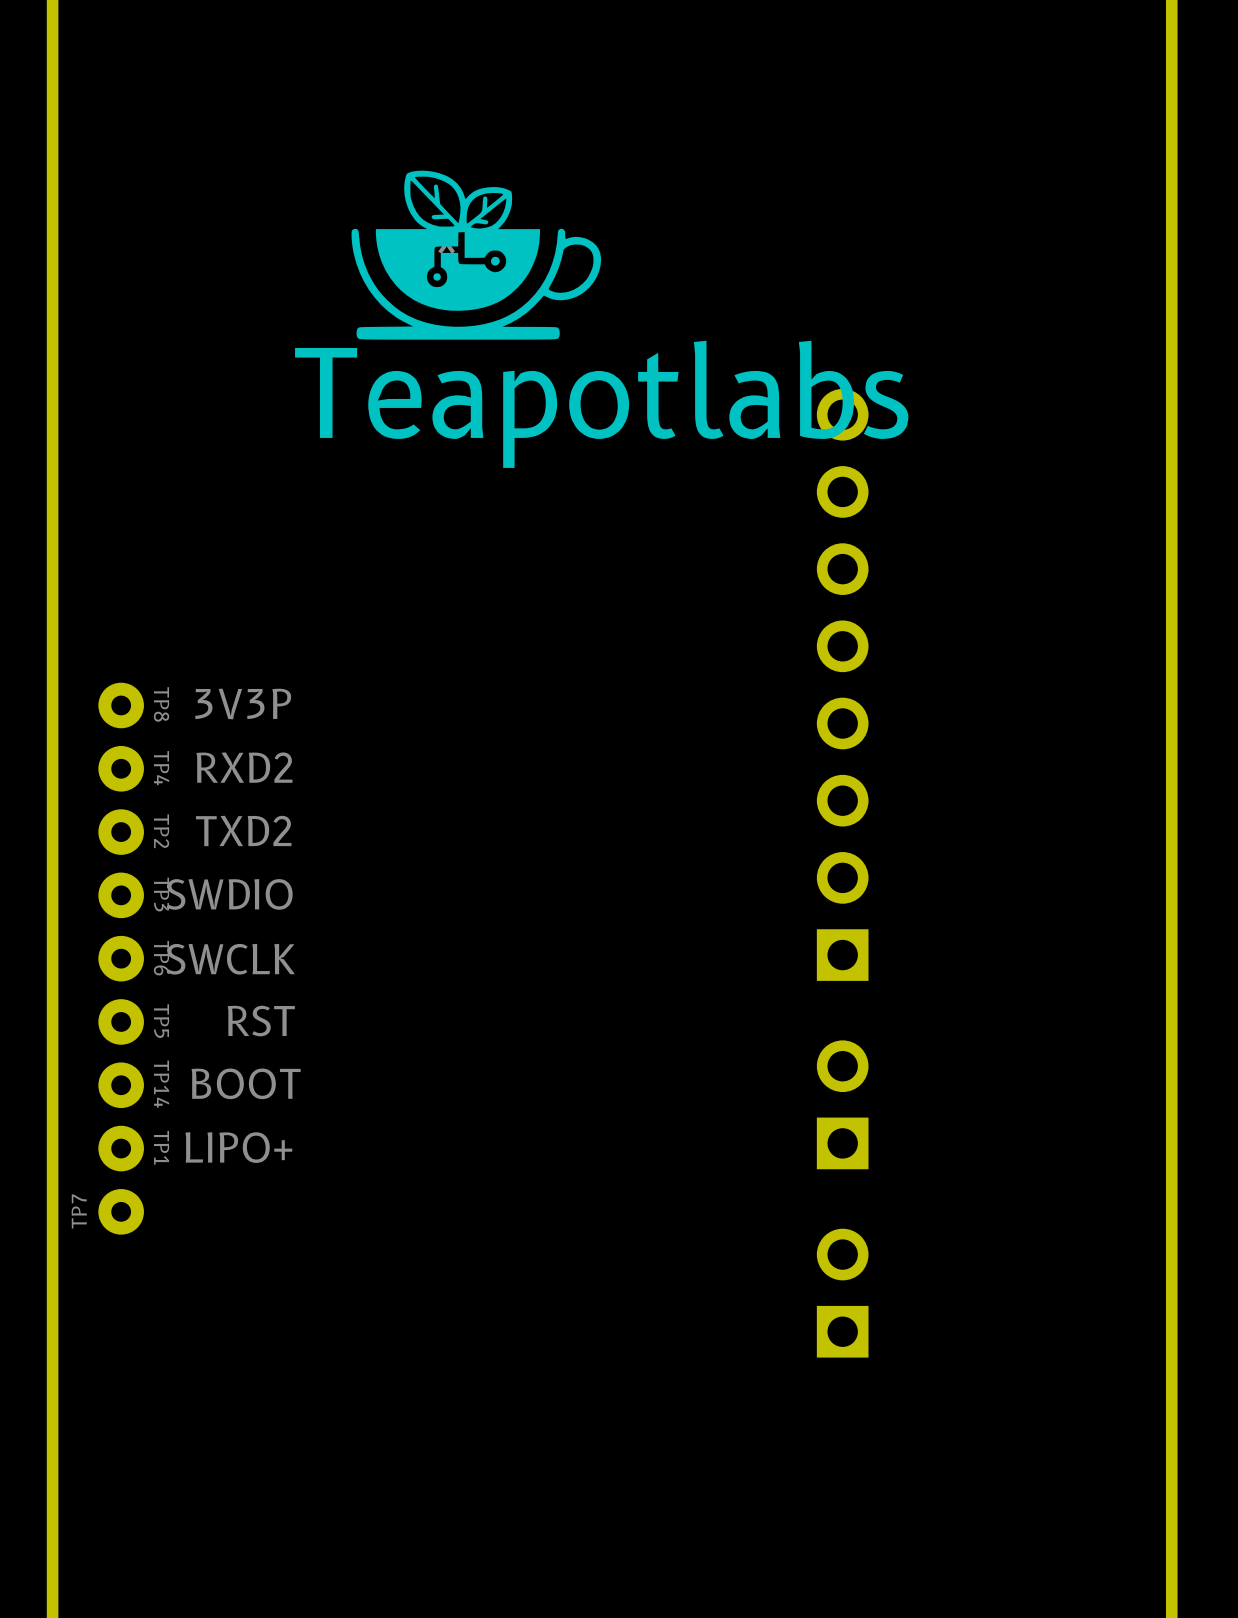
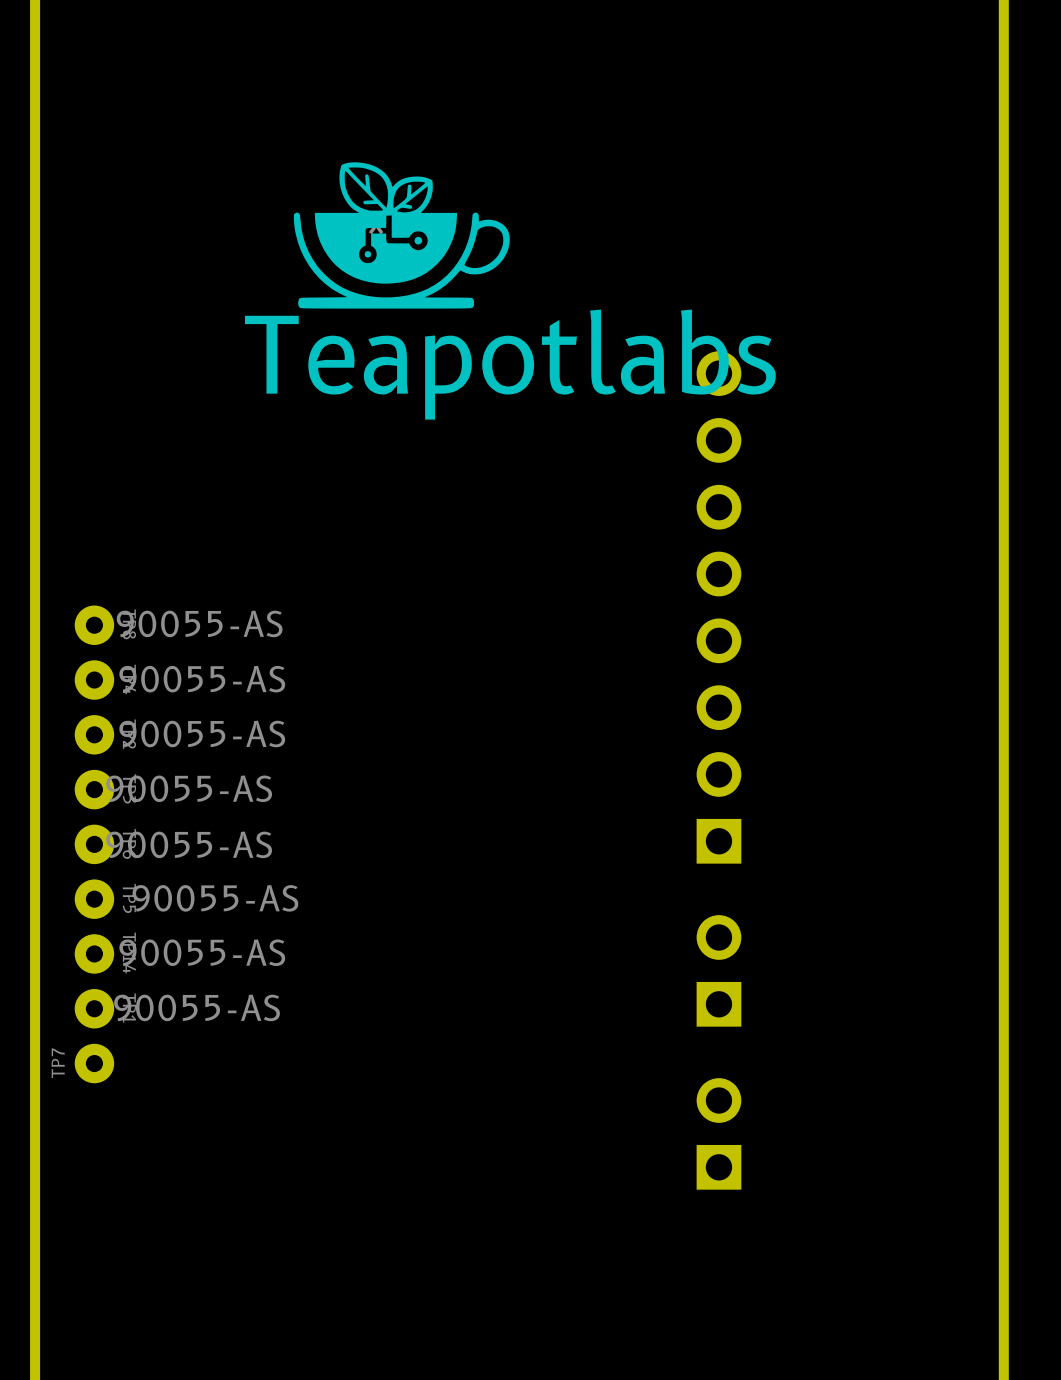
TP8 value: 3V3P (243, 703) -> 90055-AS (199, 623)
TP4 value: RXD2 (244, 767) -> 90055-AS (202, 679)
TP2 value: TXD2 (243, 830) -> 90055-AS (202, 733)
TP3 value: SWDIO (229, 894) -> 90055-AS (189, 788)
TP6 value: SWCLK (230, 959) -> 90055-AS (189, 844)
TP5 value: RST (261, 1021) -> 90055-AS (215, 898)
TP14 value: BOOT (246, 1083) -> 90055-AS (202, 952)
TP1 value: LIPO+ (238, 1147) -> 90055-AS (197, 1007)

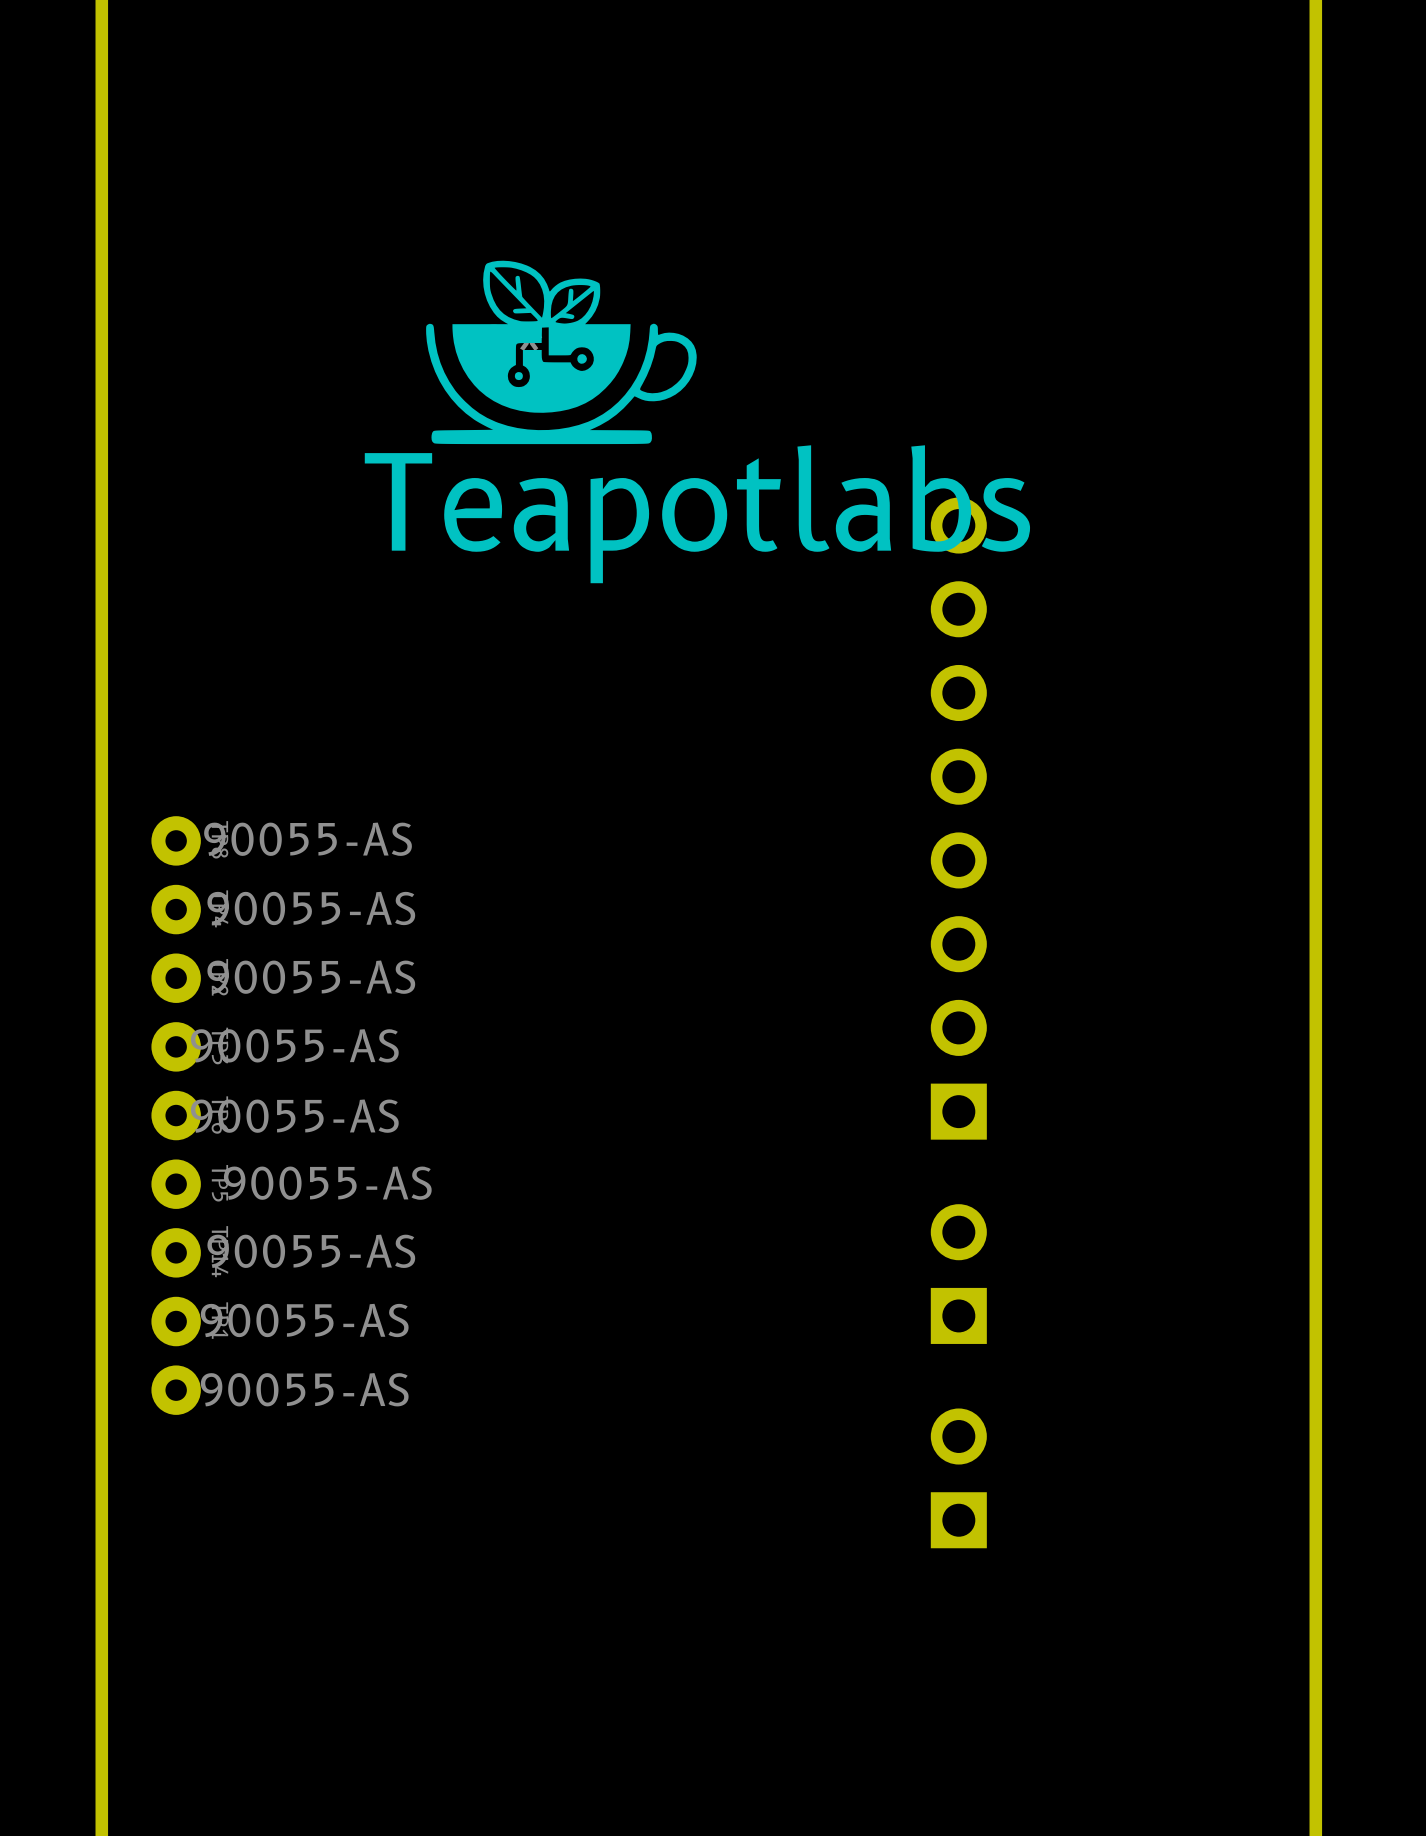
TP7 name: TP7 (58, 1063) -> none
TP7 value: none -> 90055-AS (304, 1389)

